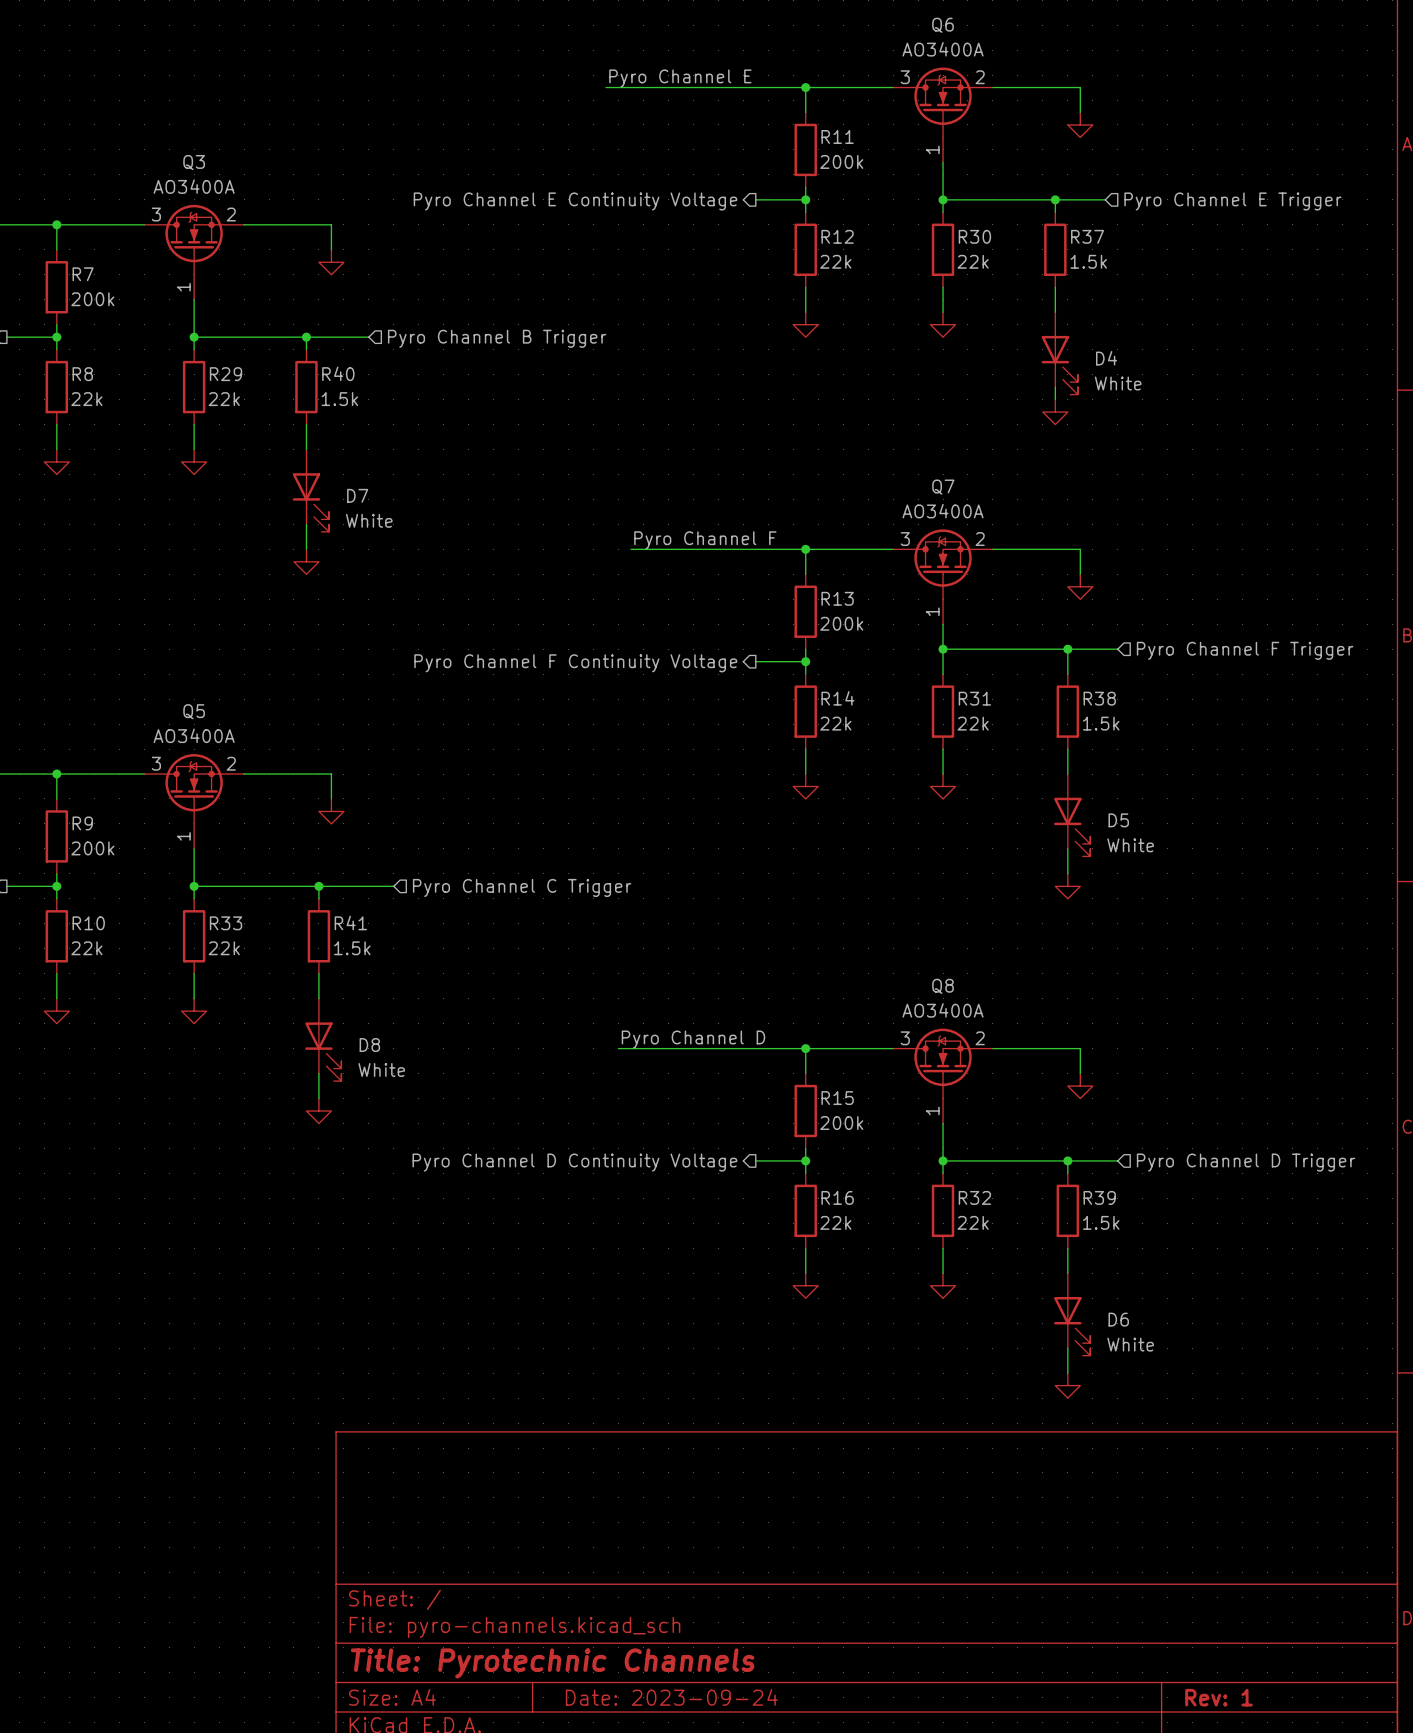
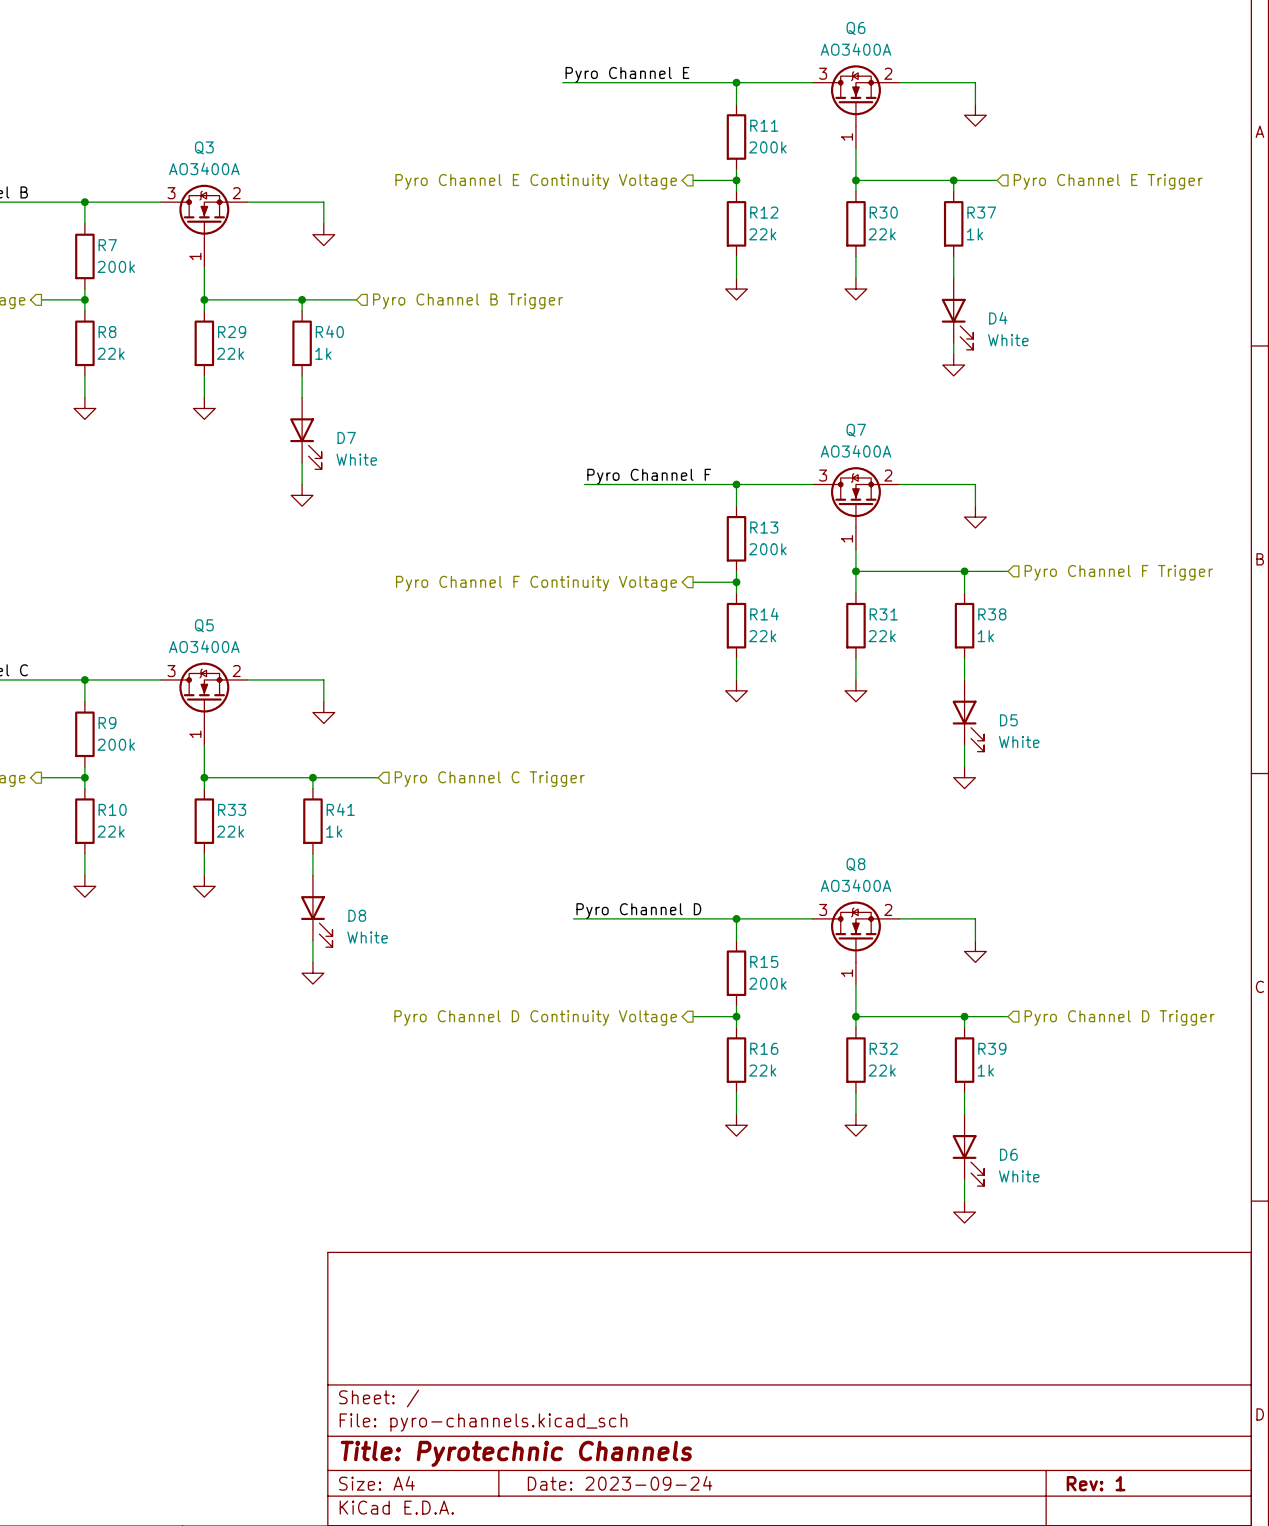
R37 value: 1.5k (1088, 261) -> 1k (974, 234)
R40 value: 1.5k (339, 399) -> 1k (323, 353)
R38 value: 1.5k (1101, 723) -> 1k (985, 636)
R41 value: 1.5k (352, 948) -> 1k (334, 831)
R39 value: 1.5k (1101, 1222) -> 1k (985, 1070)

